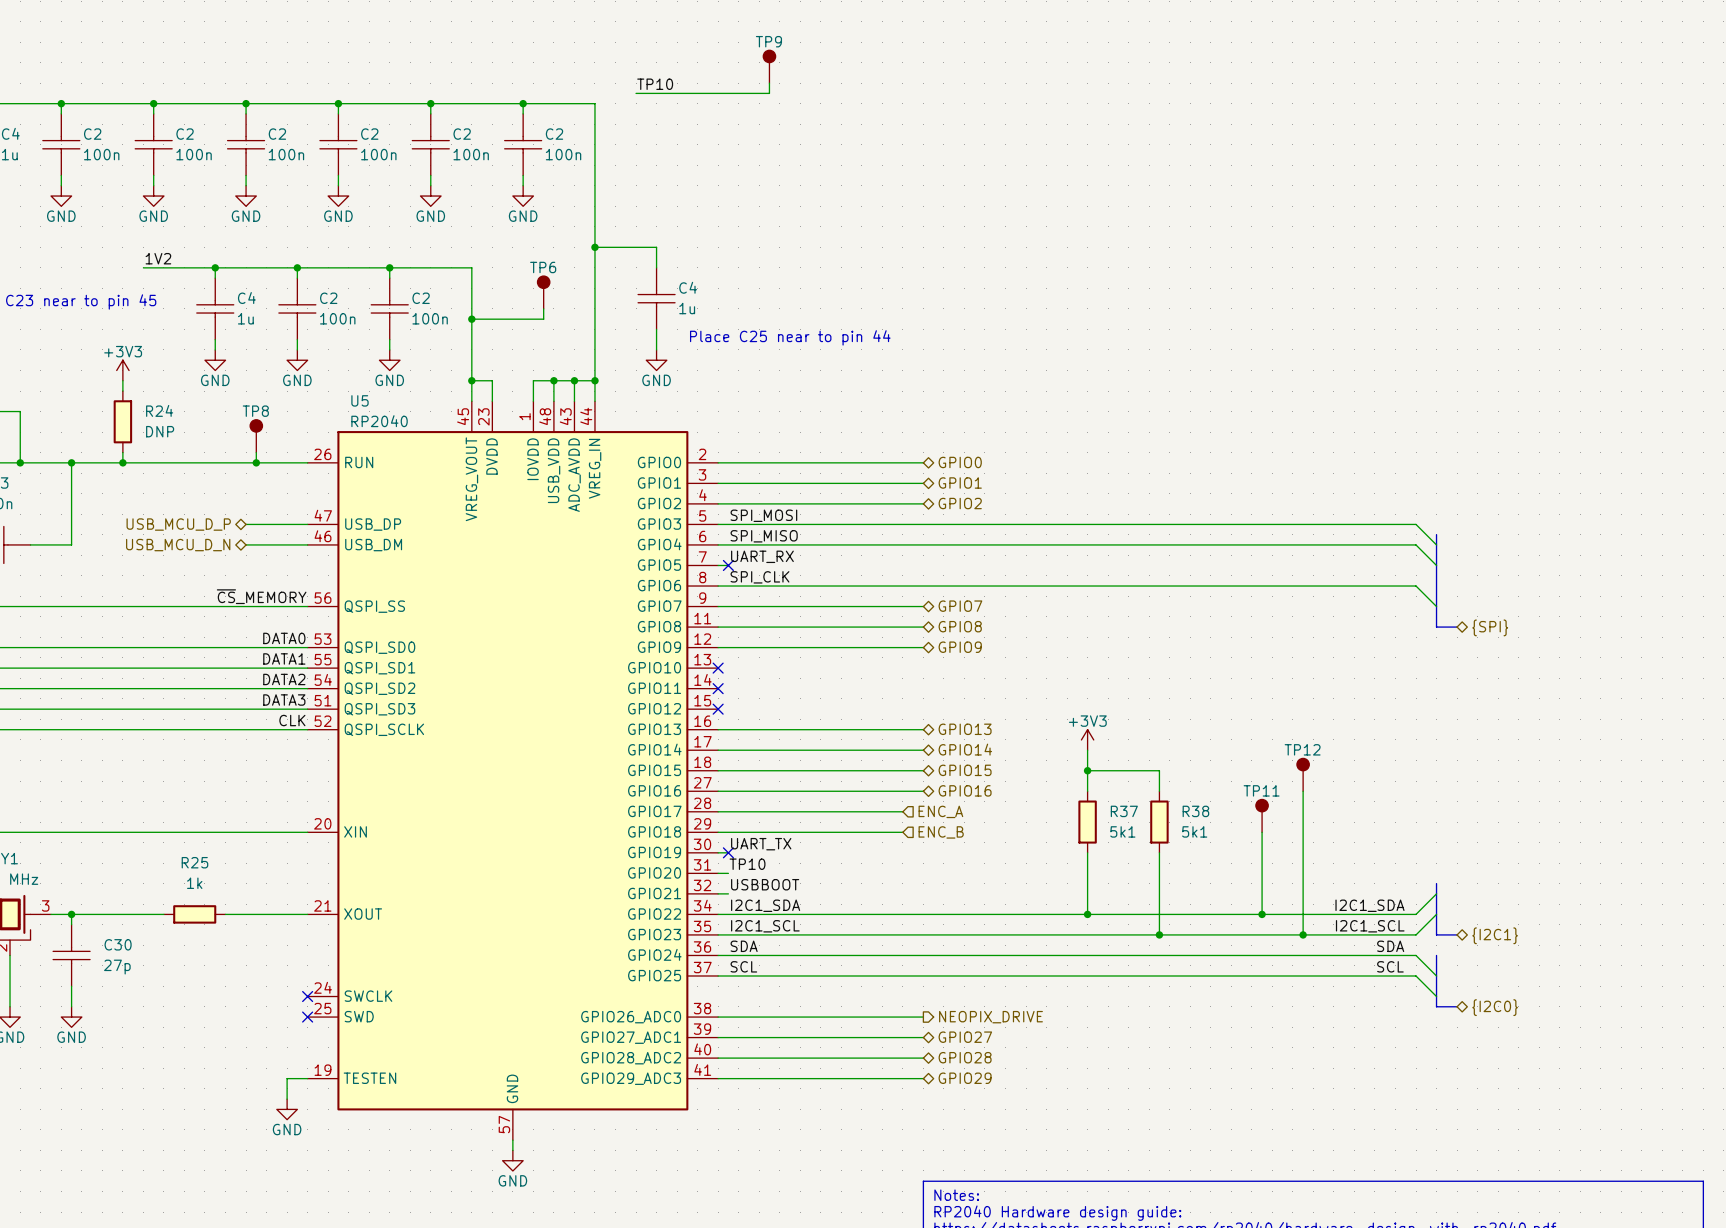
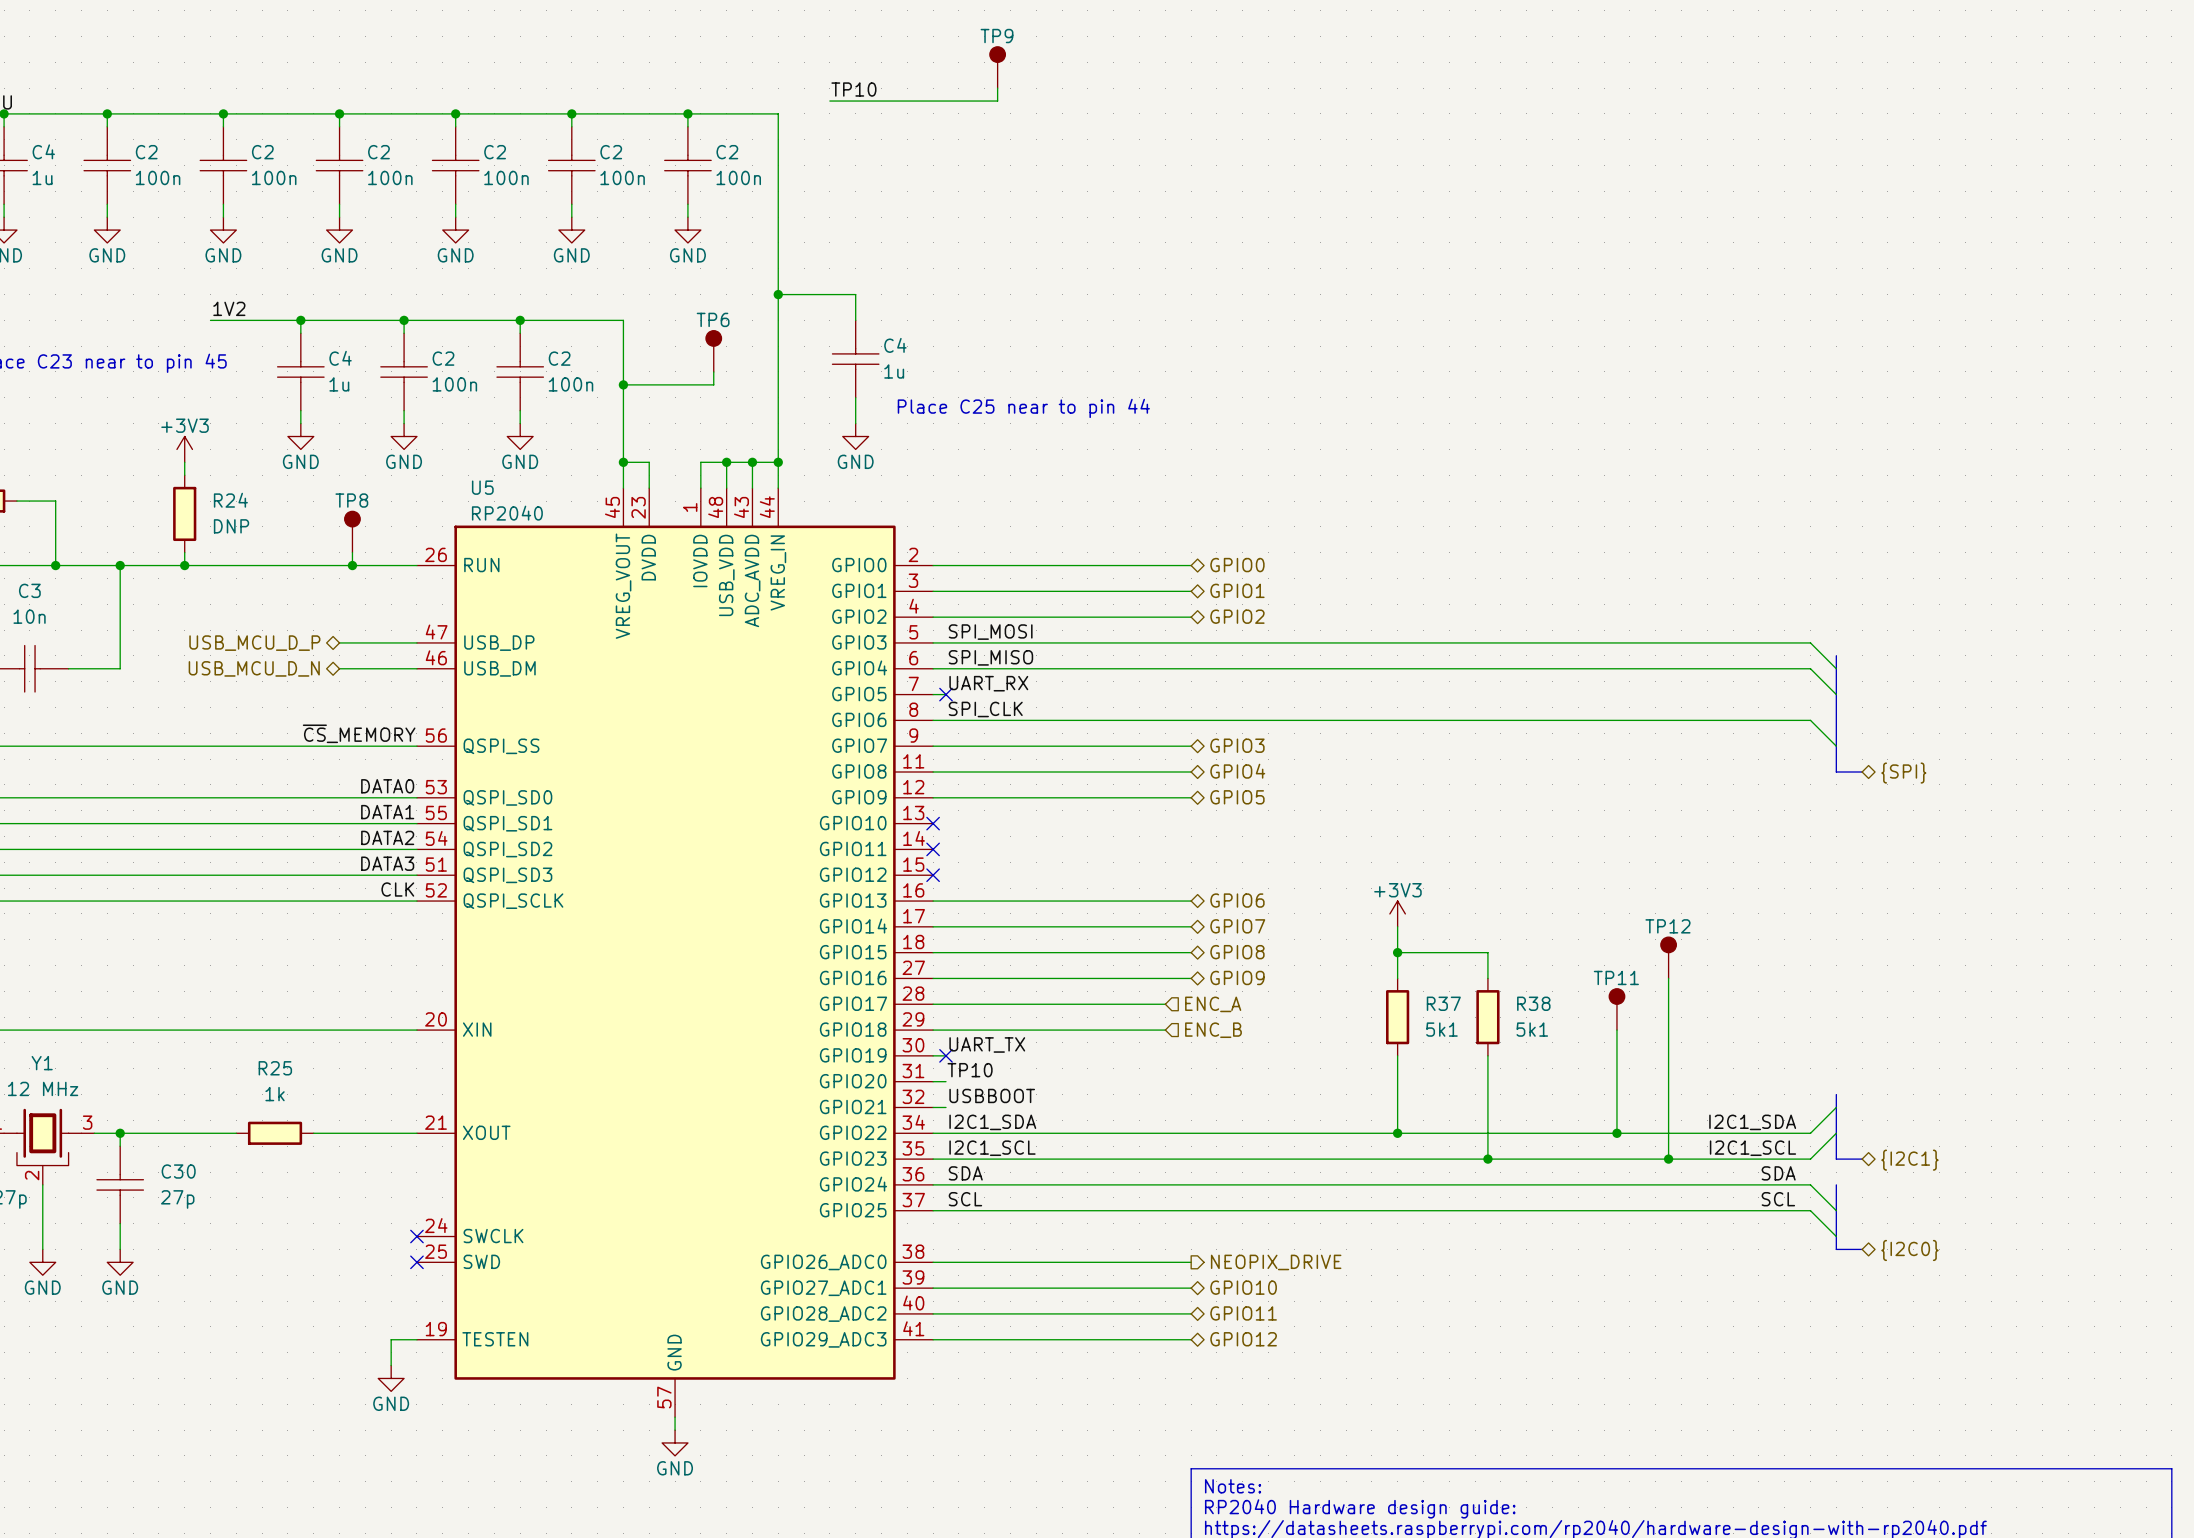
hierarchical label: GPIO7 (960, 606) -> GPIO3 (1237, 745)
hierarchical label: GPIO8 (960, 626) -> GPIO4 (1237, 771)
hierarchical label: GPIO9 (960, 647) -> GPIO5 (1237, 797)
hierarchical label: GPIO13 (965, 729) -> GPIO6 (1237, 900)
hierarchical label: GPIO14 (965, 749) -> GPIO7 (1237, 926)
hierarchical label: GPIO15 (965, 770) -> GPIO8 (1237, 952)
hierarchical label: GPIO16 (965, 790) -> GPIO9 (1237, 977)
hierarchical label: GPIO27 (965, 1037) -> GPIO10 (1243, 1287)
hierarchical label: GPIO28 (965, 1057) -> GPIO11 (1243, 1313)
hierarchical label: GPIO29 (965, 1078) -> GPIO12 (1243, 1339)

